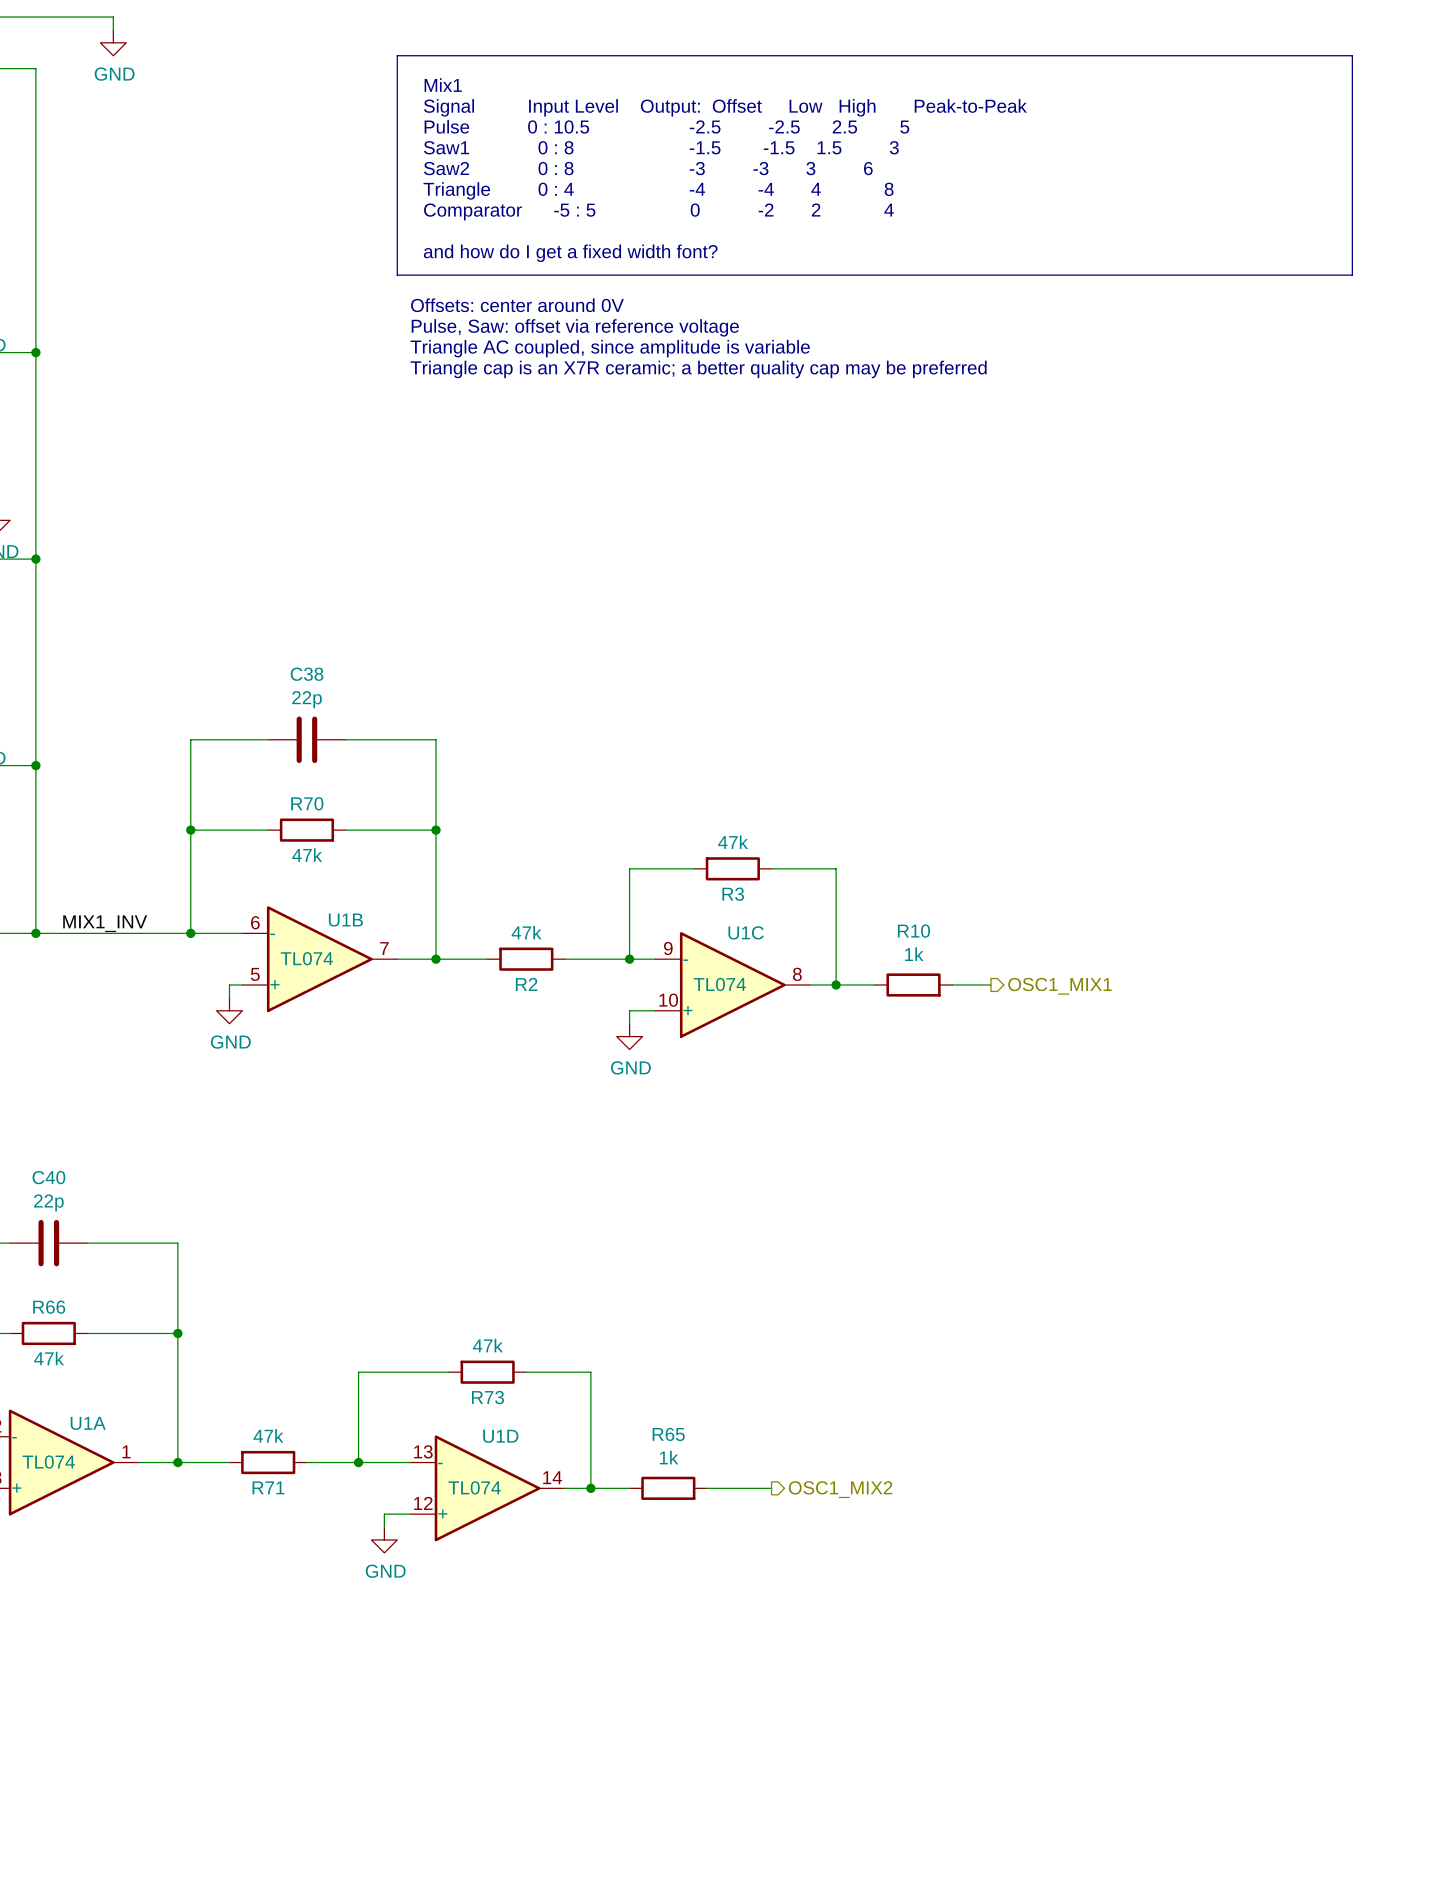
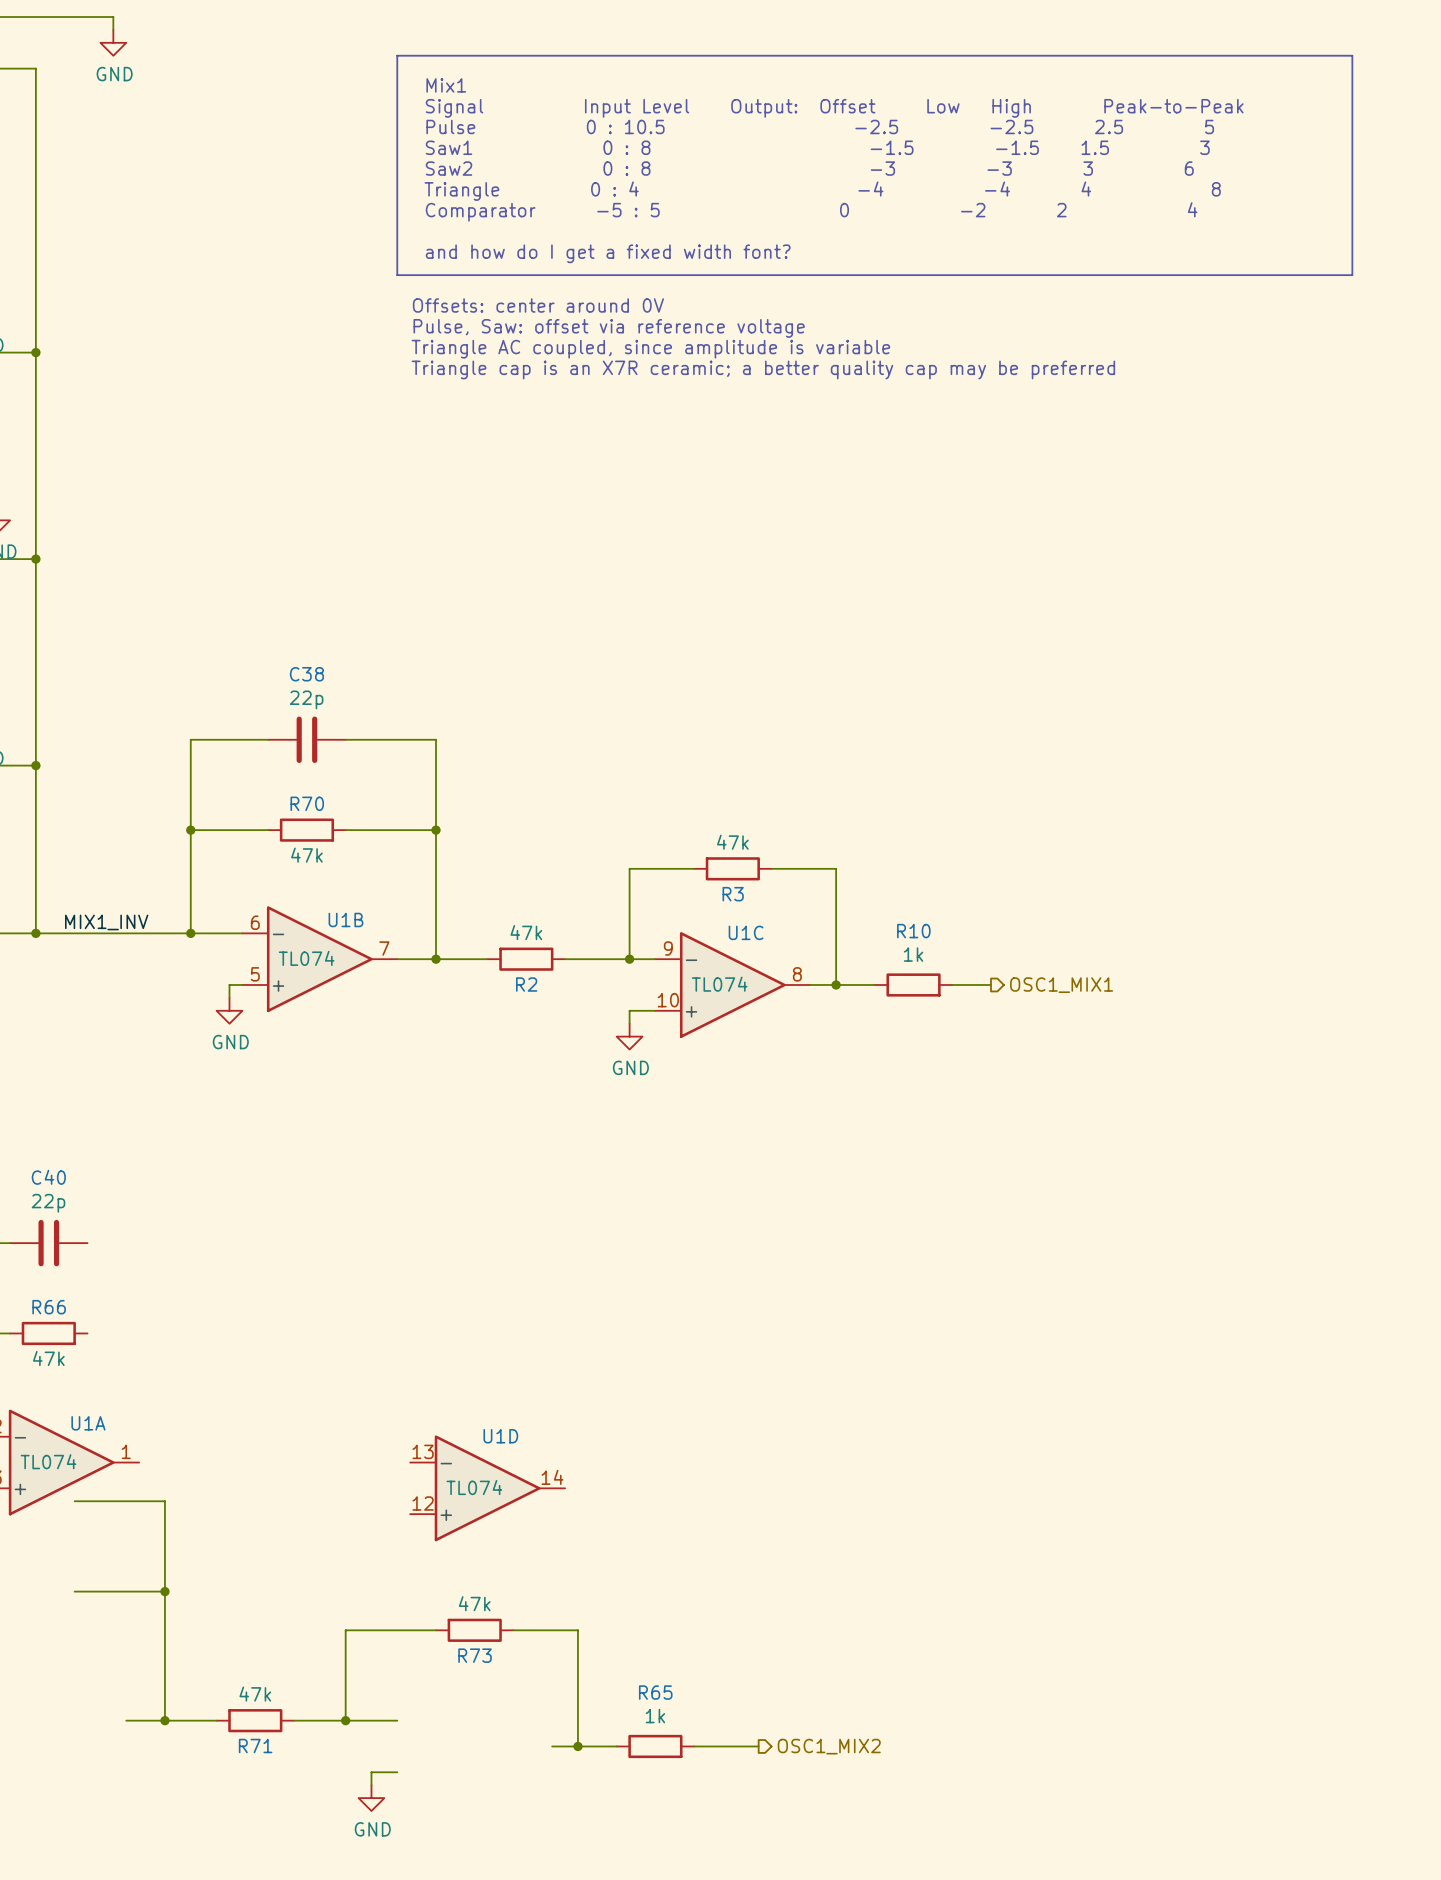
wire: (87, 1243) (177, 1243) (177, 1462) -> none
wire: (87, 1333) (177, 1333) -> none
junction: (177, 1333) -> none
wire: (448, 1372) (358, 1372) (358, 1462) -> none
R73 position: (487, 1372) -> (474, 1630)
wire: (526, 1372) (590, 1372) (590, 1488) -> none
wire: (139, 1462) (229, 1462) -> (74, 1591) (164, 1591)
junction: (177, 1462) -> none
R71 position: (268, 1462) -> (255, 1720)
wire: (306, 1462) (410, 1462) -> none
junction: (358, 1462) -> none
wire: (565, 1488) (629, 1488) -> none
junction: (590, 1488) -> none
R65 position: (668, 1488) -> (655, 1746)
wire: (707, 1488) (771, 1488) -> none
hierarchical label: OSC1_MIX2 (840, 1489) -> none
wire: none -> (74, 1501) (164, 1501) (164, 1720)
wire: (410, 1514) (384, 1514) (384, 1527) -> none
power symbol: GND (384, 1539) -> none
junction: none -> (164, 1591)
wire: none -> (436, 1630) (345, 1630) (345, 1720)
wire: none -> (513, 1630) (577, 1630) (577, 1746)
wire: none -> (126, 1720) (216, 1720)
junction: none -> (164, 1720)
wire: none -> (294, 1720) (397, 1720)
junction: none -> (345, 1720)
wire: none -> (552, 1746) (616, 1746)
junction: none -> (577, 1746)
wire: none -> (694, 1746) (758, 1746)
hierarchical label: none -> OSC1_MIX2 (829, 1746)
wire: none -> (397, 1772) (371, 1772) (371, 1785)
power symbol: none -> GND (371, 1798)

